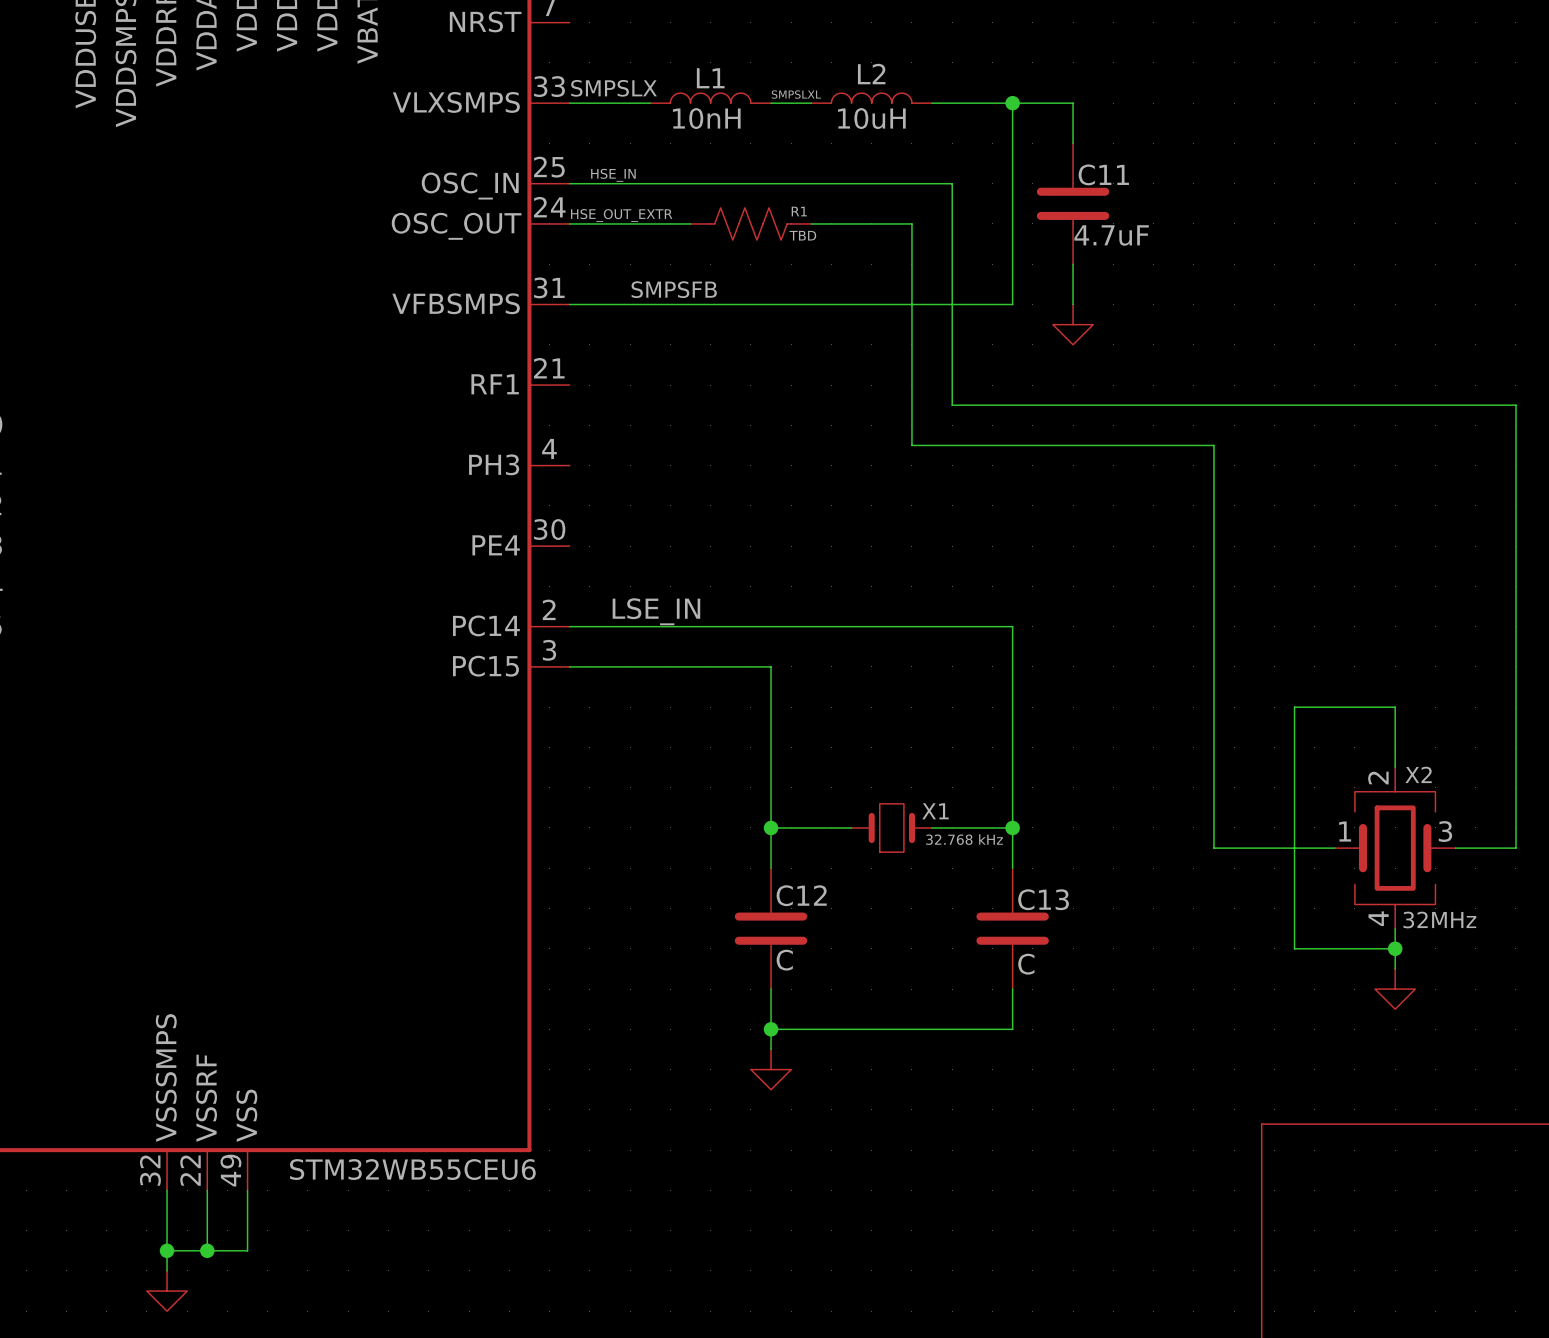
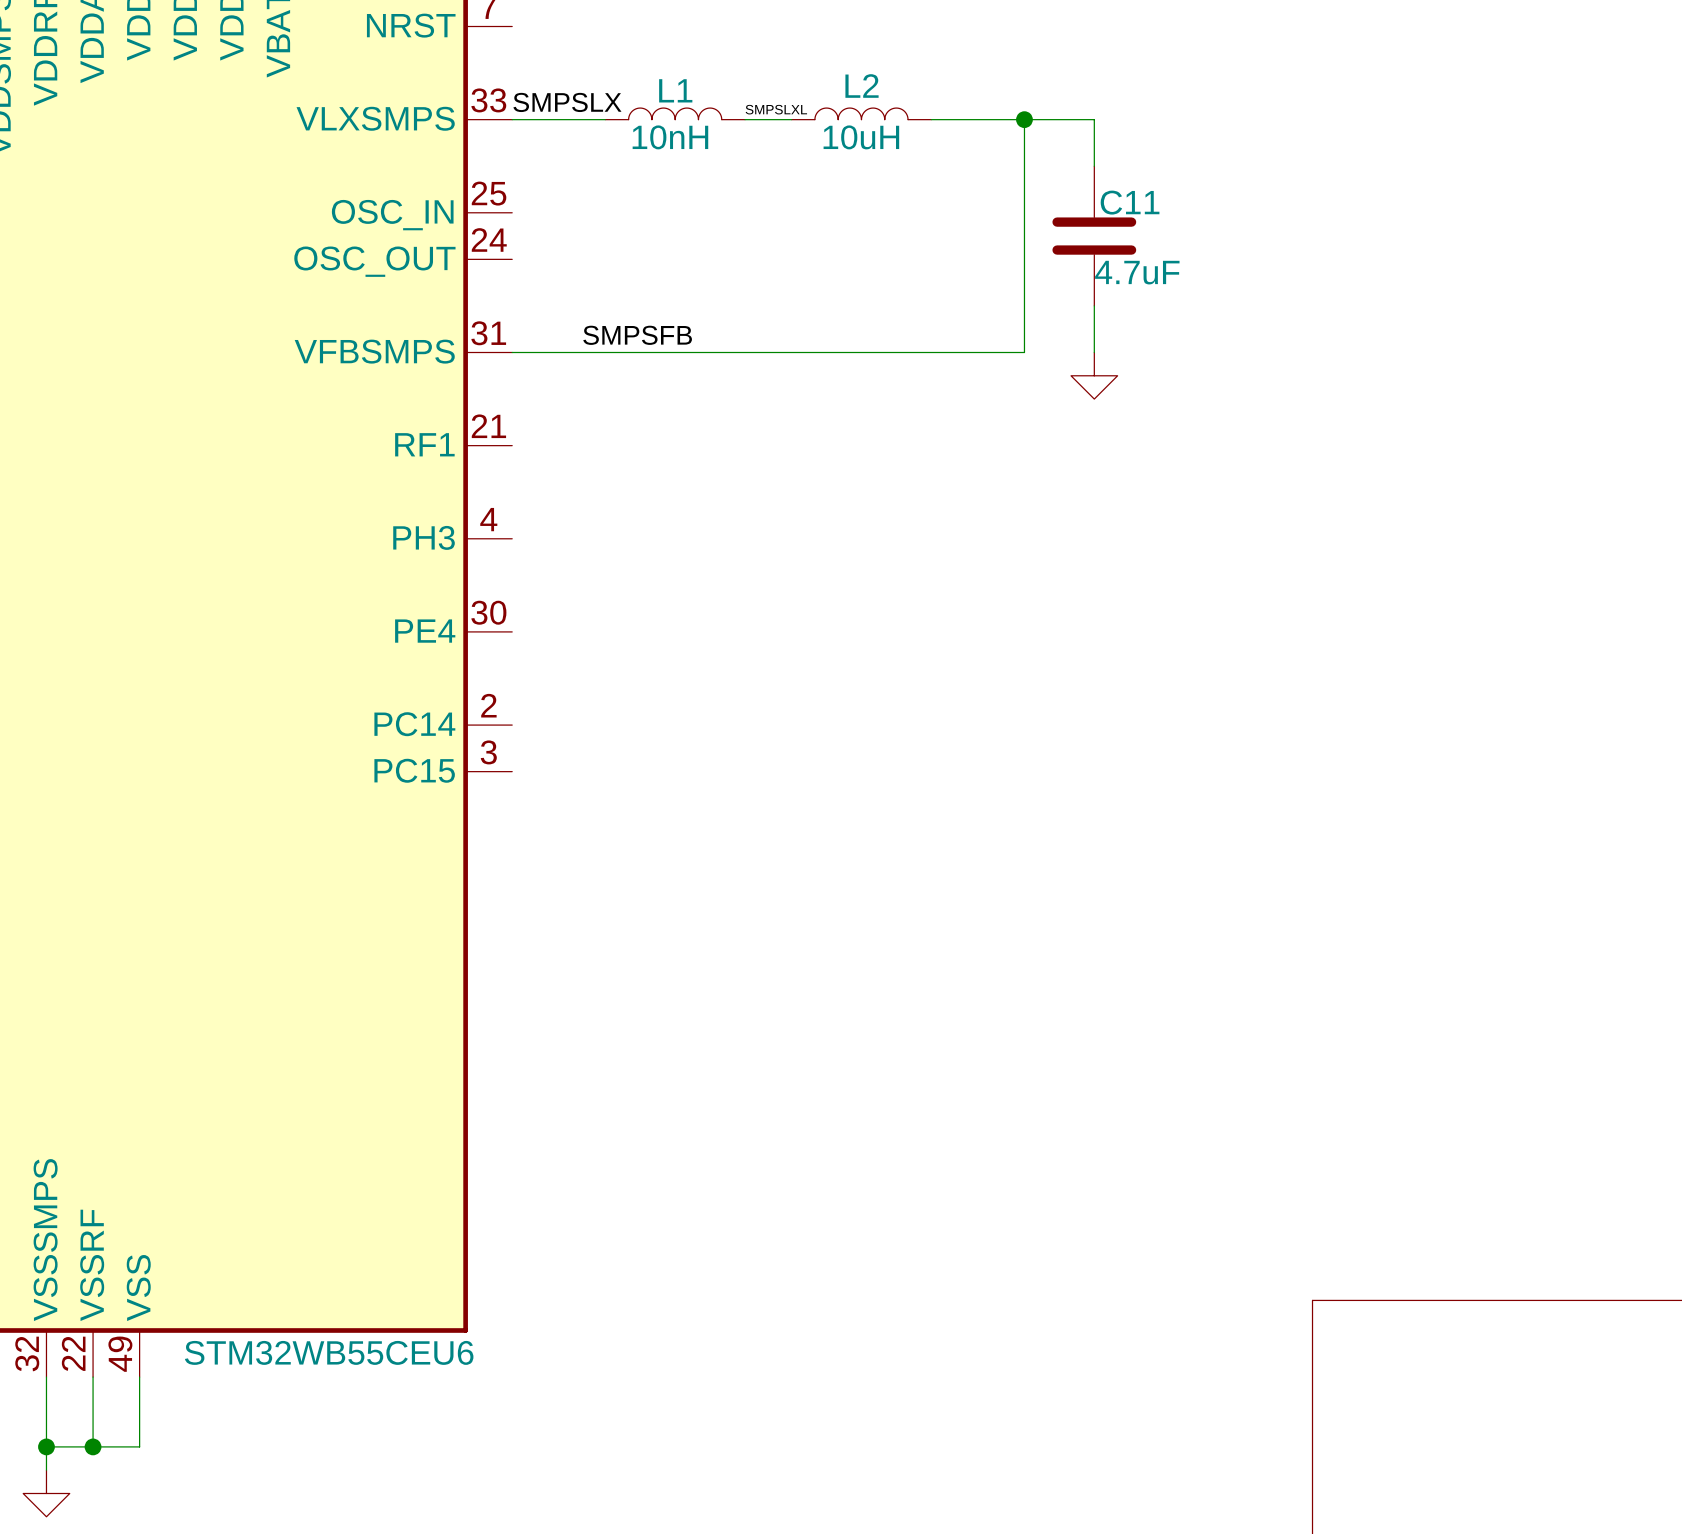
label: HSE_IN (613, 175) -> none
wire: (569, 183) (952, 183) (952, 405) (1515, 405) (1515, 848) (1455, 848) -> none
label: HSE_OUT_EXTR (621, 215) -> none
wire: (569, 223) (690, 223) -> none
R1: TBD (750, 223) -> none
wire: (811, 223) (911, 223) (911, 445) (1213, 445) (1213, 848) (1334, 848) -> none
label: LSE_IN (656, 611) -> none
wire: (569, 626) (1012, 626) (1012, 868) -> none
wire: (569, 666) (771, 666) (771, 868) -> none
wire: (1395, 767) (1395, 707) (1294, 707) (1294, 948) (1395, 948) -> none
wire: (771, 827) (851, 827) -> none
junction: (771, 827) -> none
X1: 32.768 kHz (891, 827) -> none
wire: (932, 827) (1012, 827) -> none
junction: (1012, 827) -> none
X2: 32MHz (1395, 848) -> none
C12: C (771, 928) -> none
C13: C (1012, 928) -> none
wire: (1395, 928) (1395, 968) -> none
junction: (1395, 948) -> none
wire: (771, 989) (771, 1049) -> none
wire: (1012, 989) (1012, 1029) (771, 1029) -> none
power symbol: (1395, 989) -> none
junction: (771, 1029) -> none
power symbol: (771, 1069) -> none

